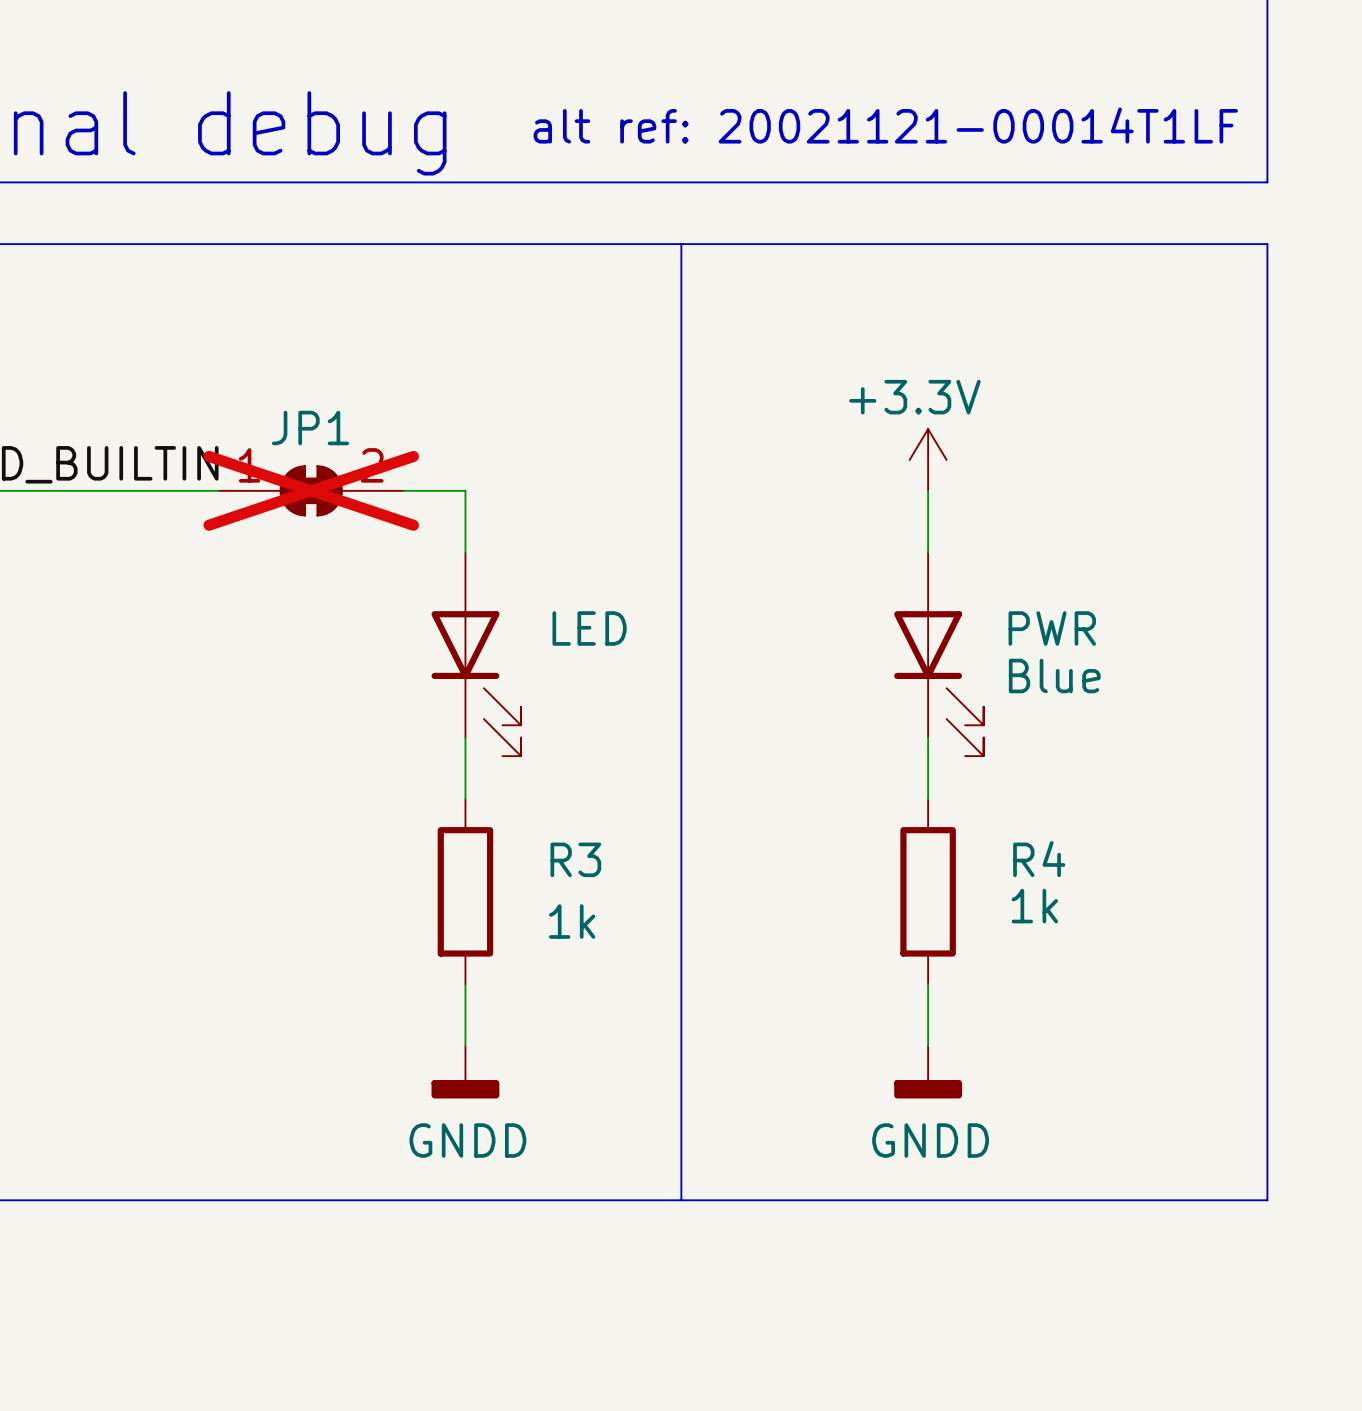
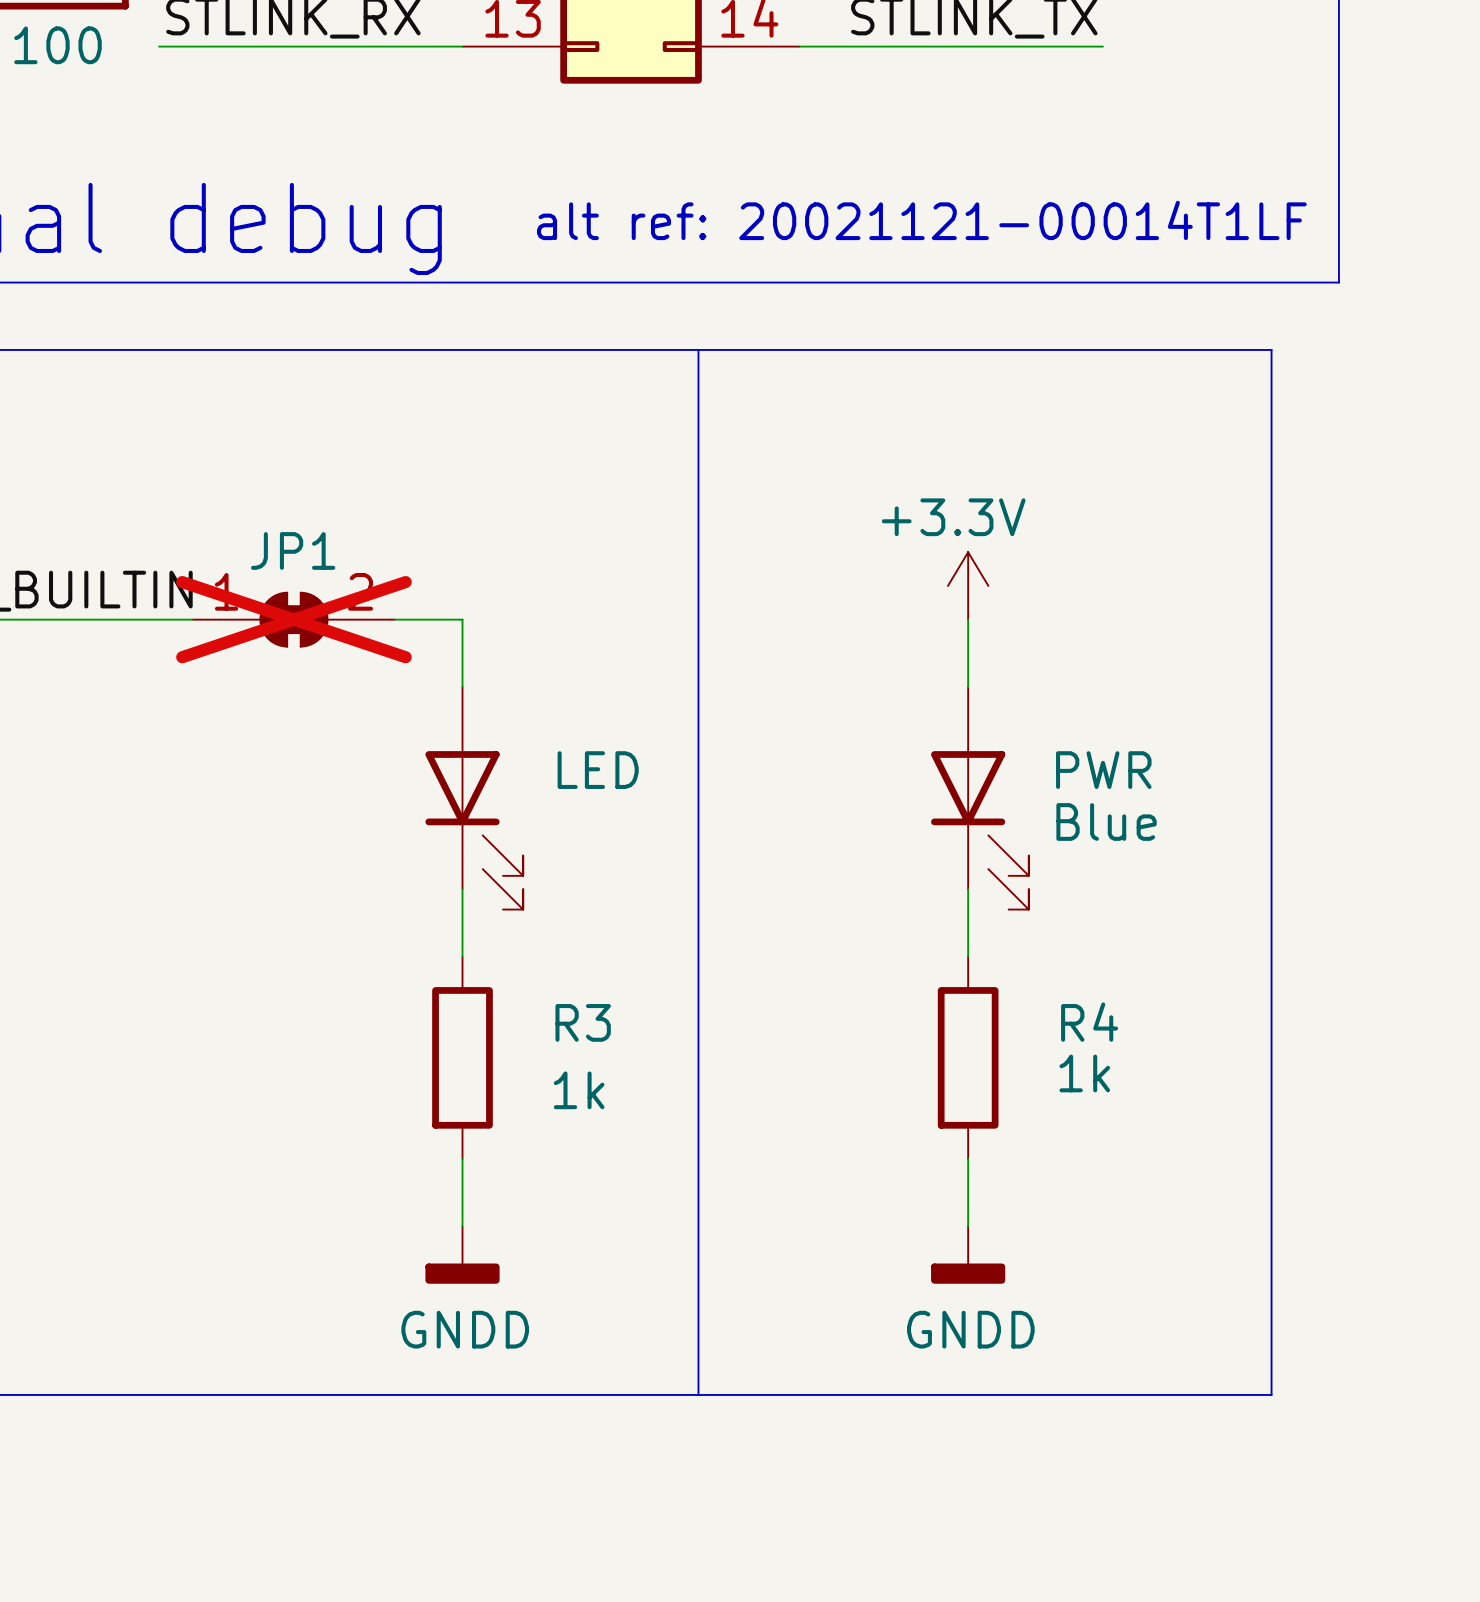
line: (1205, 244) (1267, 244) (1267, 1200) (1205, 1200) -> (1271, 349) (1271, 1394)

